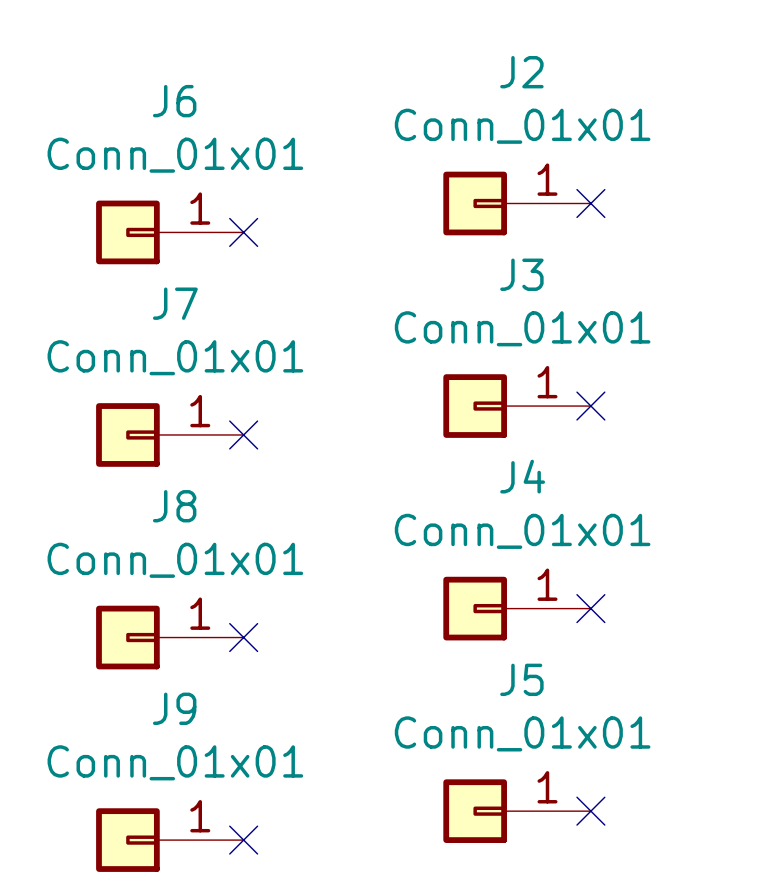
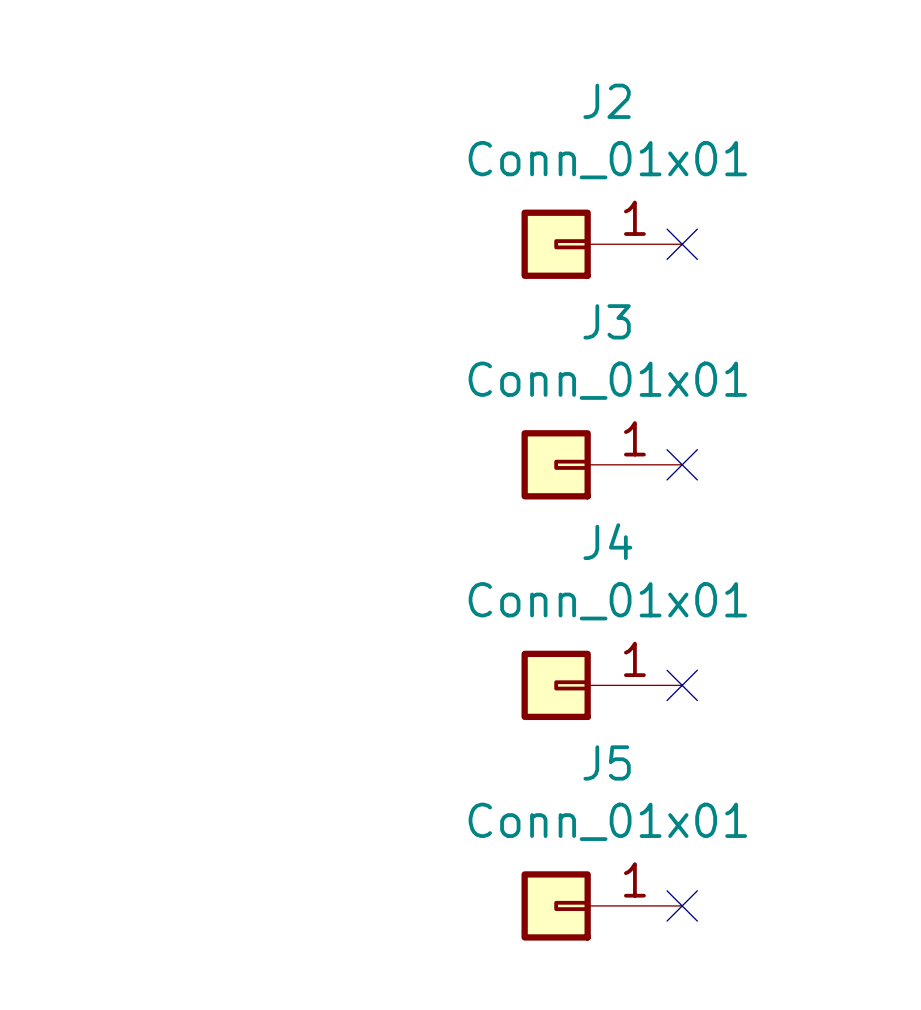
J6: Conn_01x01 (169, 232) -> none
no-connect mark: (243, 232) -> none
J7: Conn_01x01 (169, 434) -> none
no-connect mark: (243, 434) -> none
J8: Conn_01x01 (169, 637) -> none
no-connect mark: (243, 637) -> none
J9: Conn_01x01 (169, 840) -> none
no-connect mark: (243, 840) -> none

